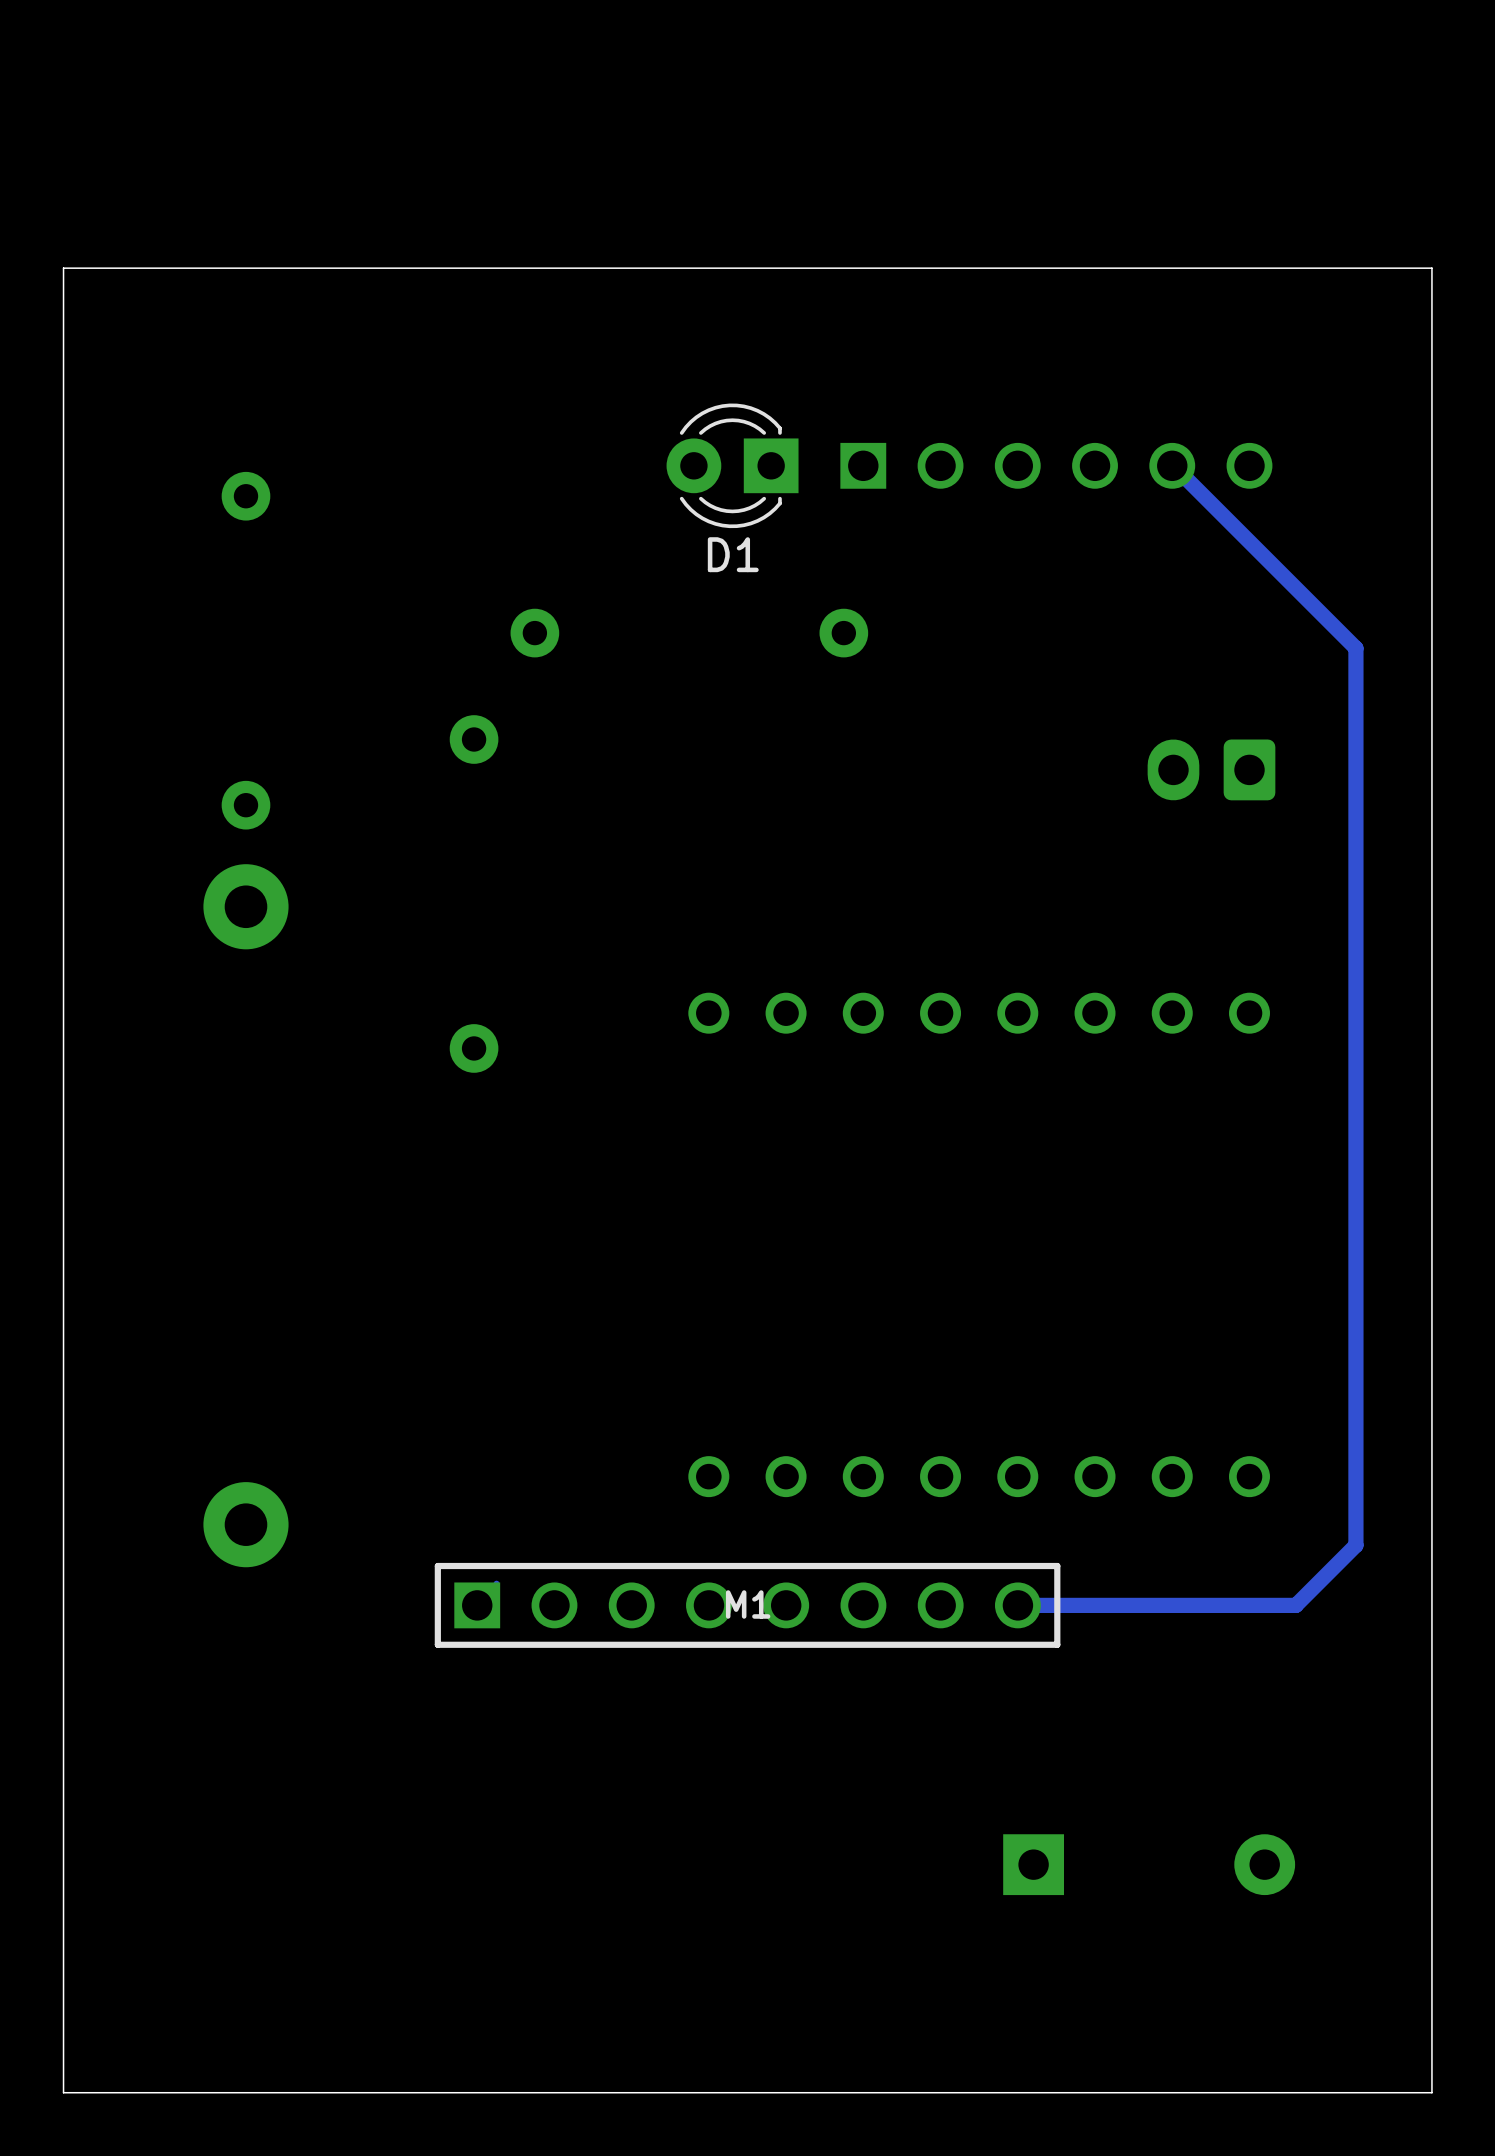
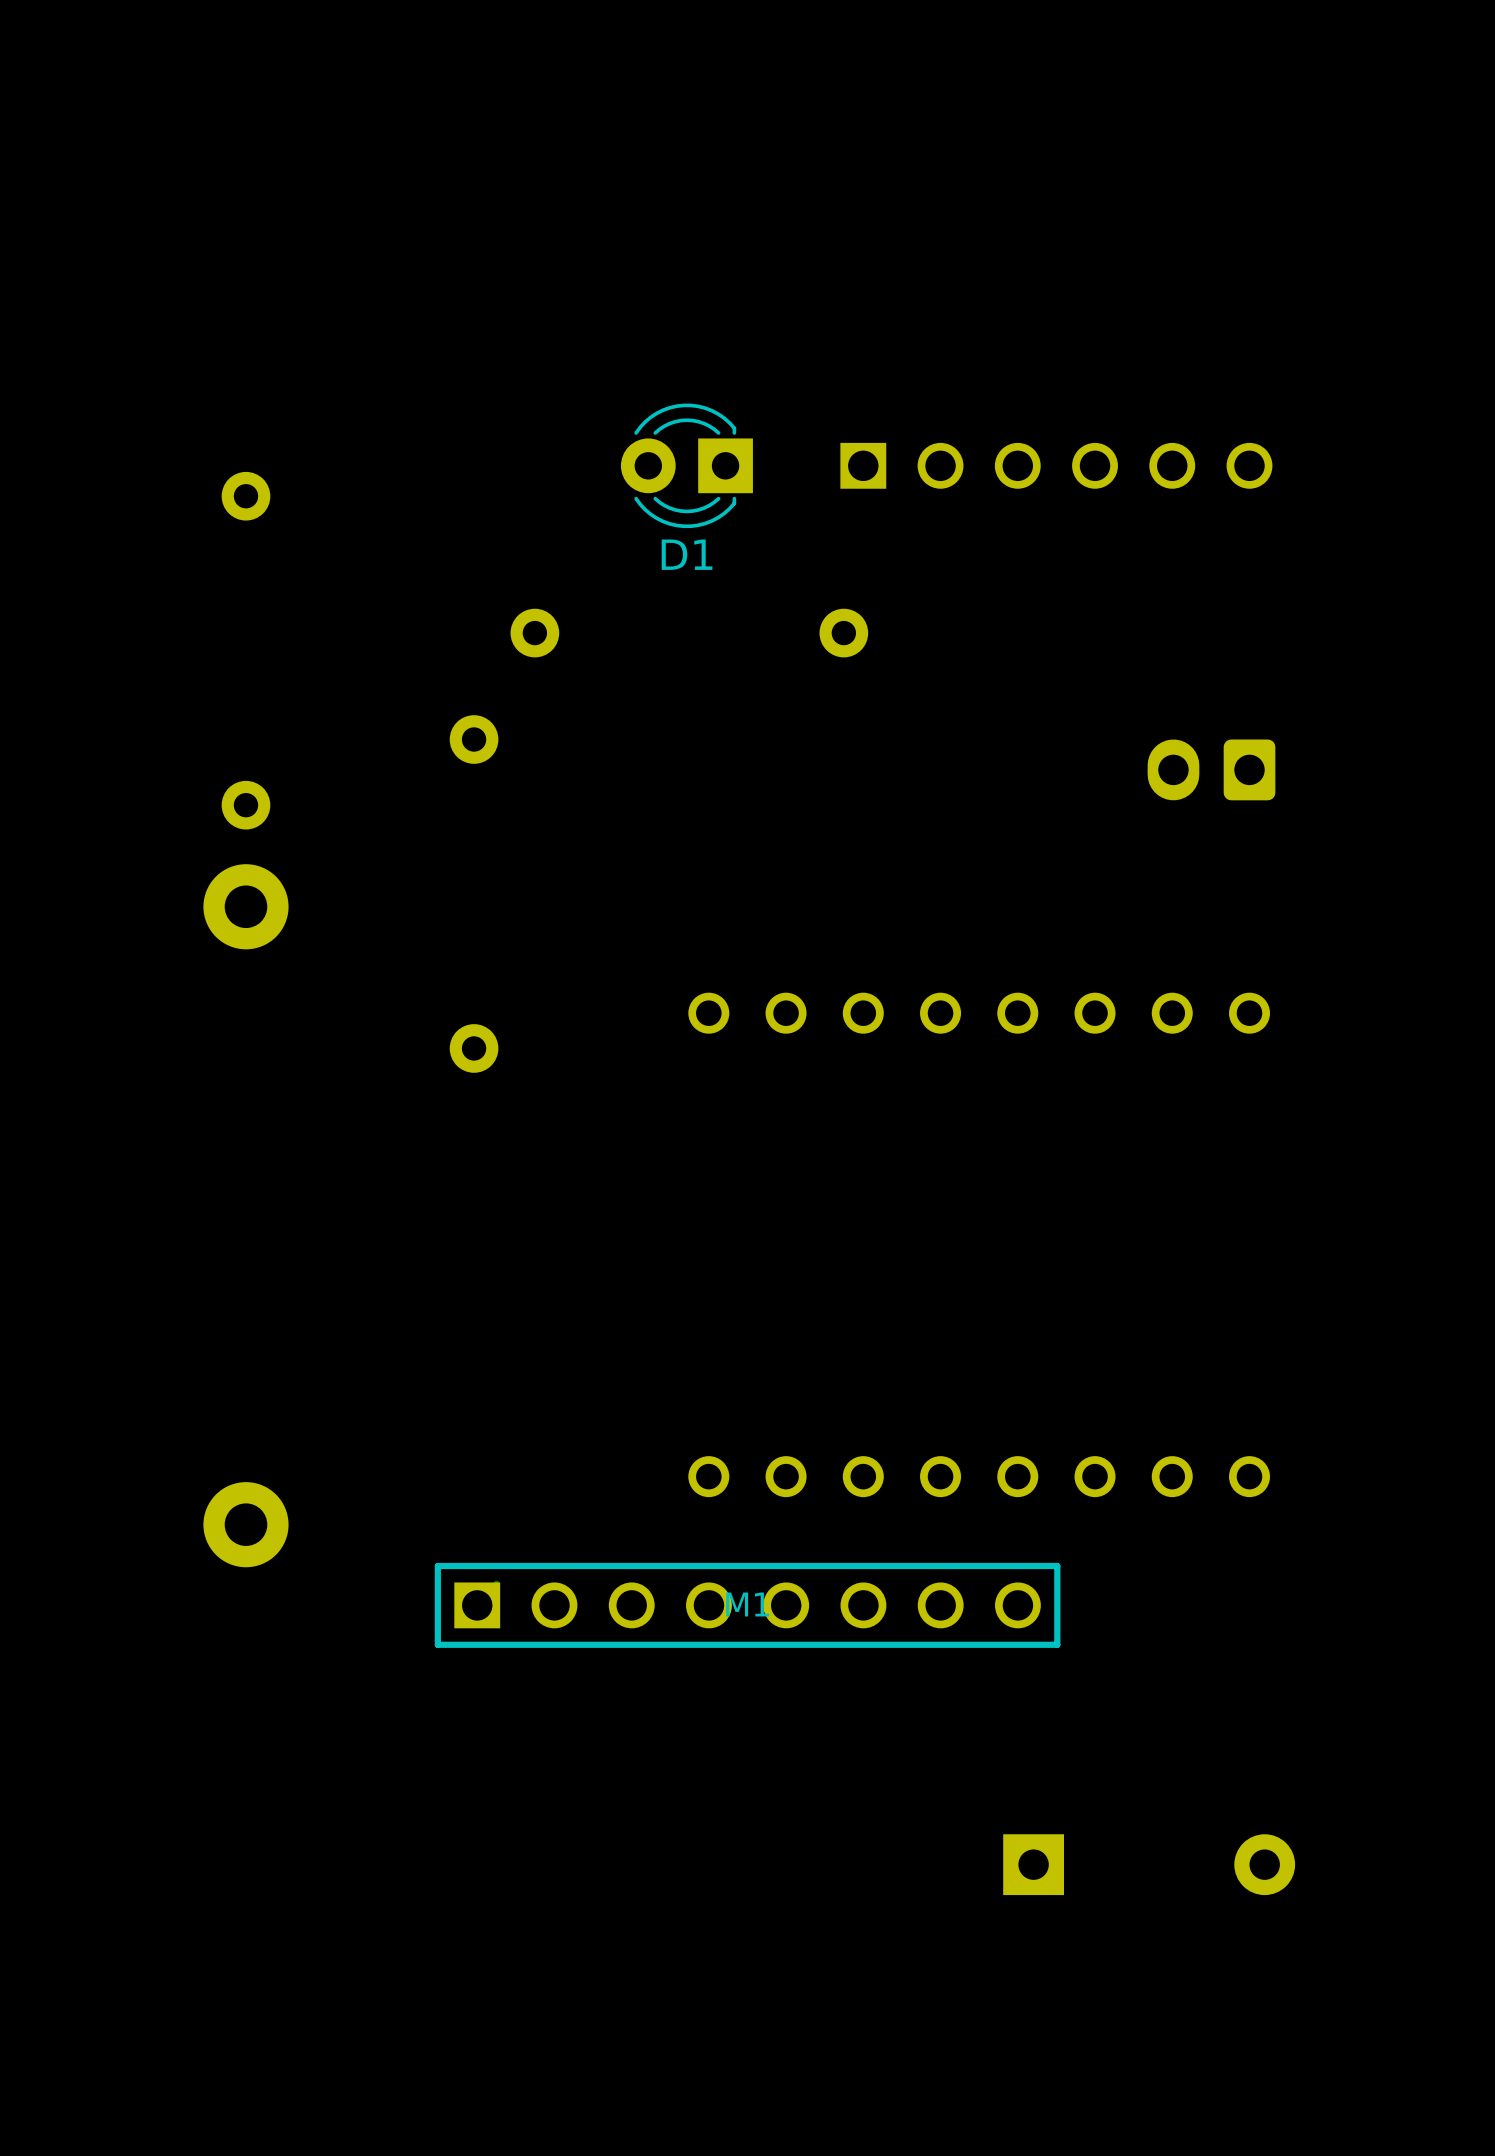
board edge: (1431, 268) (63, 268) (63, 2092) (1431, 2092) (1431, 268) -> none
D1 position: (732, 465) -> (686, 465)
track: (1172, 465) (1355, 648) (1355, 1545) (1295, 1605) (1017, 1605) -> none

